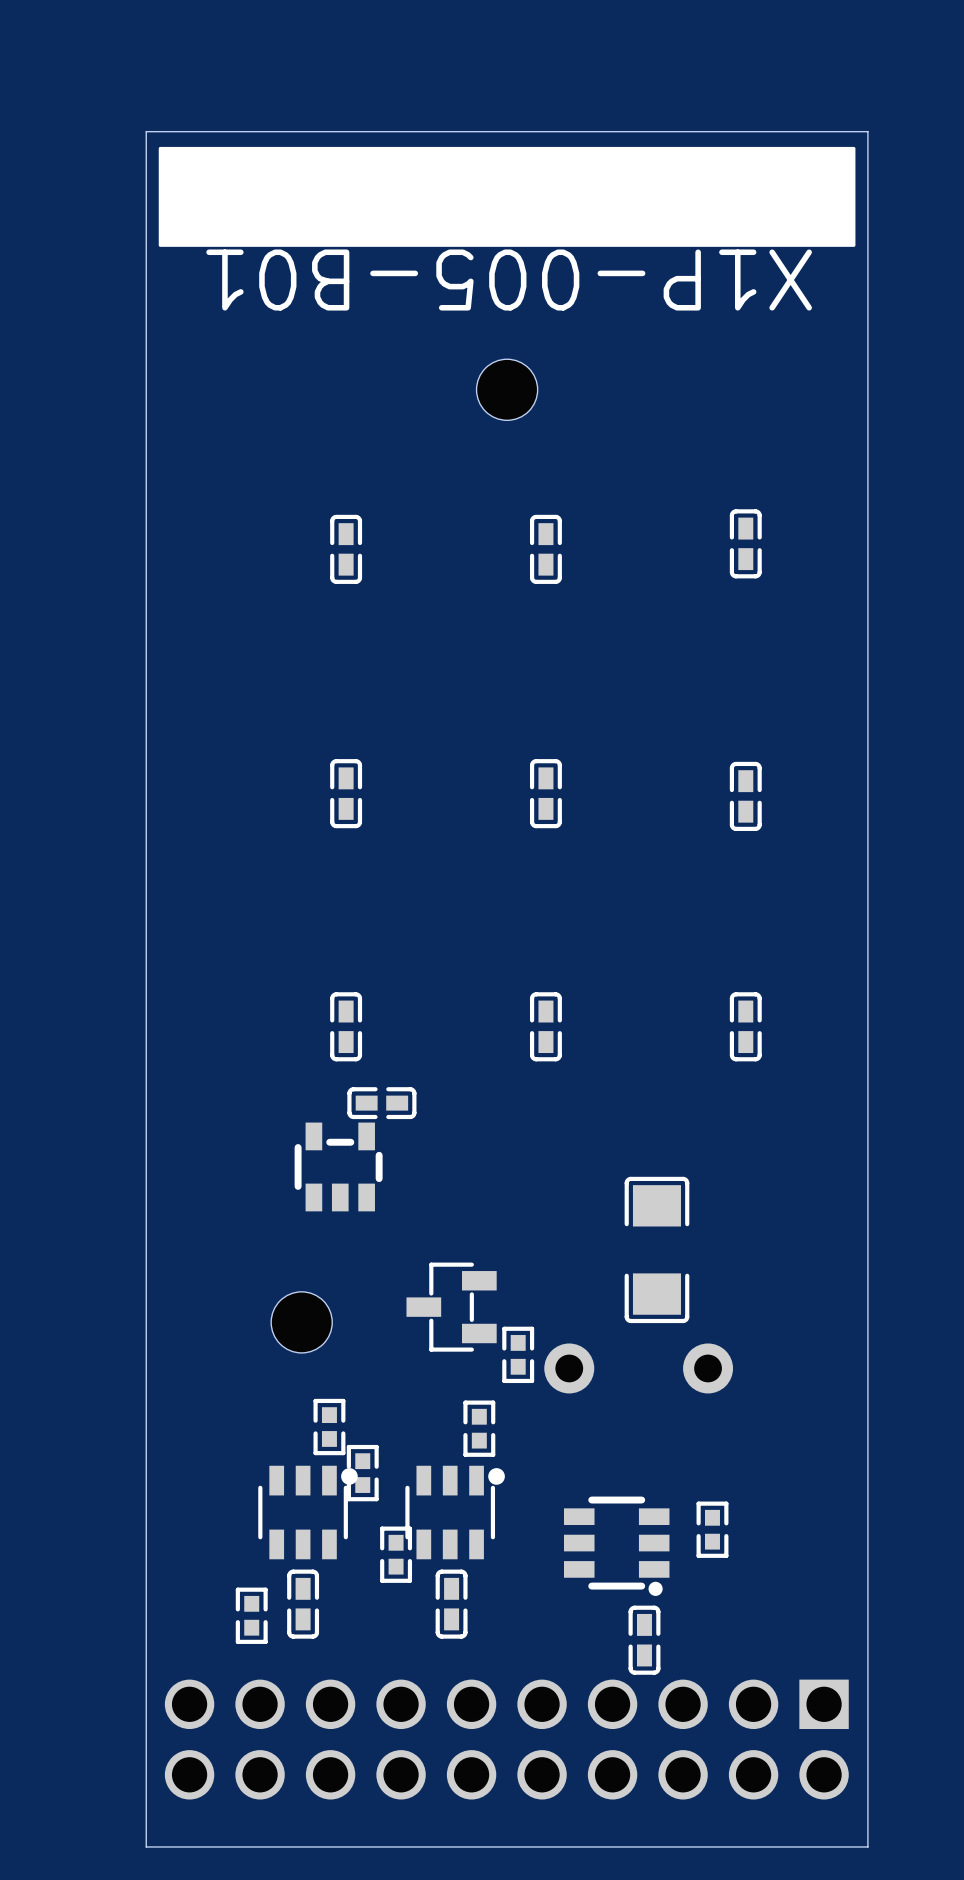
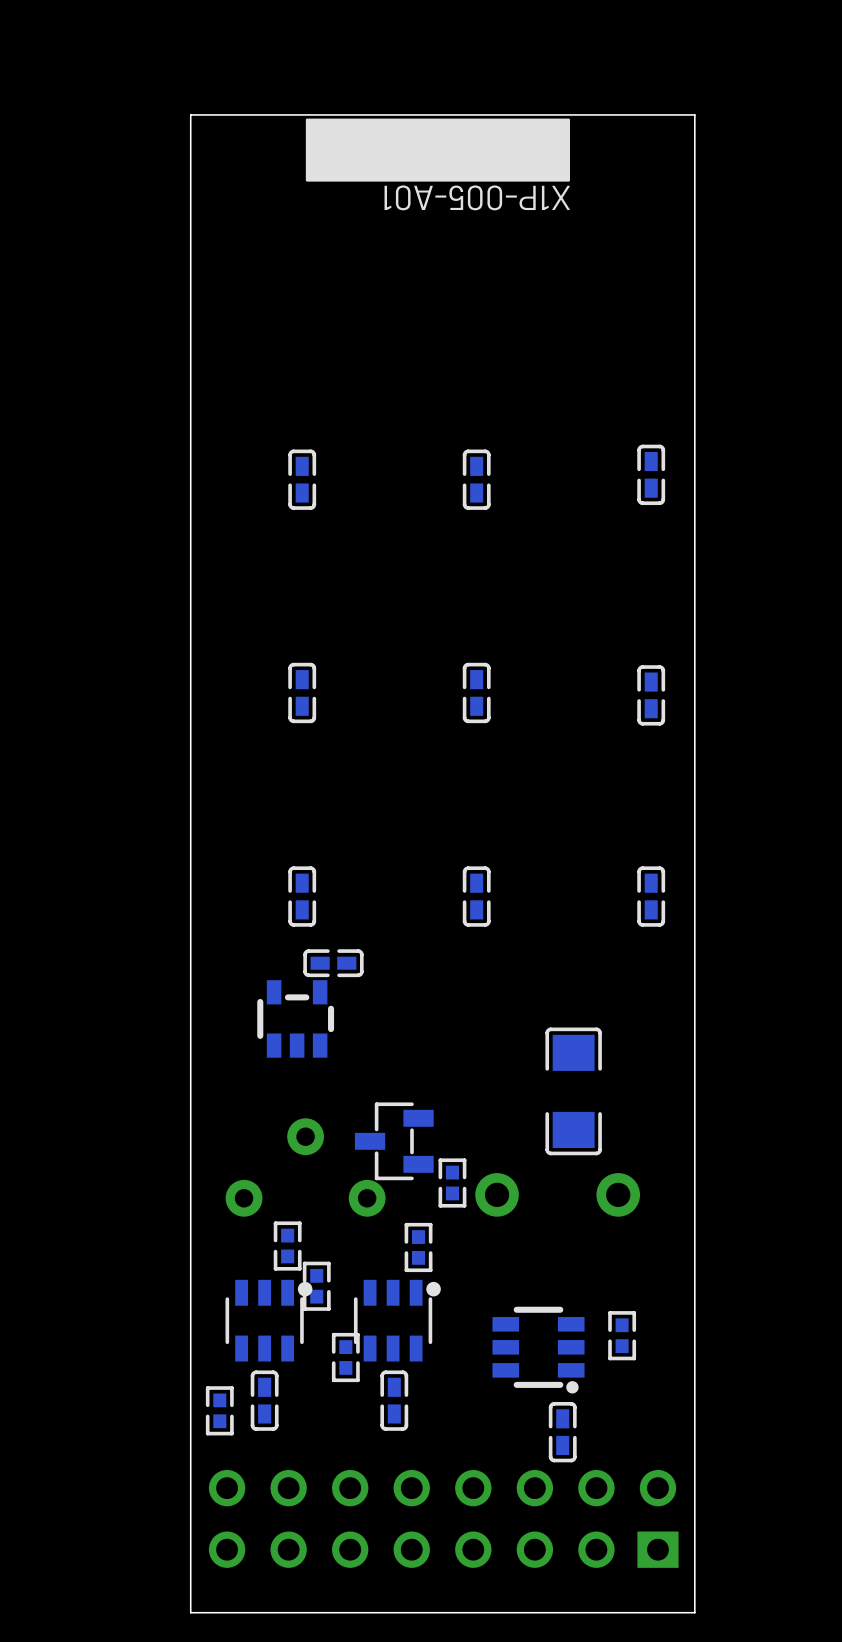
board edge: (218, 131) (146, 131) (146, 1846) (218, 1846) -> (190, 114) (190, 1612)
board edge: (795, 131) (867, 131) (867, 1846) (795, 1846) -> (694, 114) (694, 1612)
drawing shape: [158, 146, 856, 247] -> [305, 118, 571, 182]
text: X1P-005-B01 (509, 280) -> X1P-005-A01 (477, 197)
part: (507, 389) -> none
part: (301, 1322) -> none
part: none -> (305, 1167)
part footprint: [164, 1679, 849, 1800] -> [208, 1469, 679, 1568]

